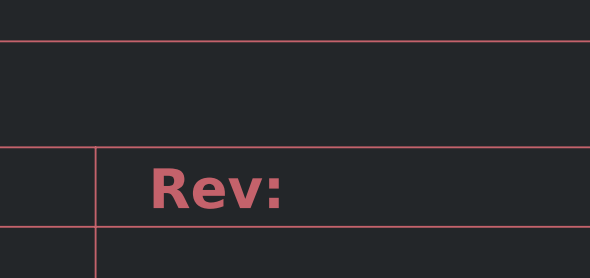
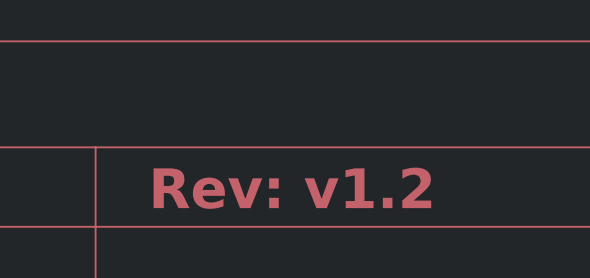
title block: Rev: (216, 188) -> Rev: v1.2 (292, 188)

